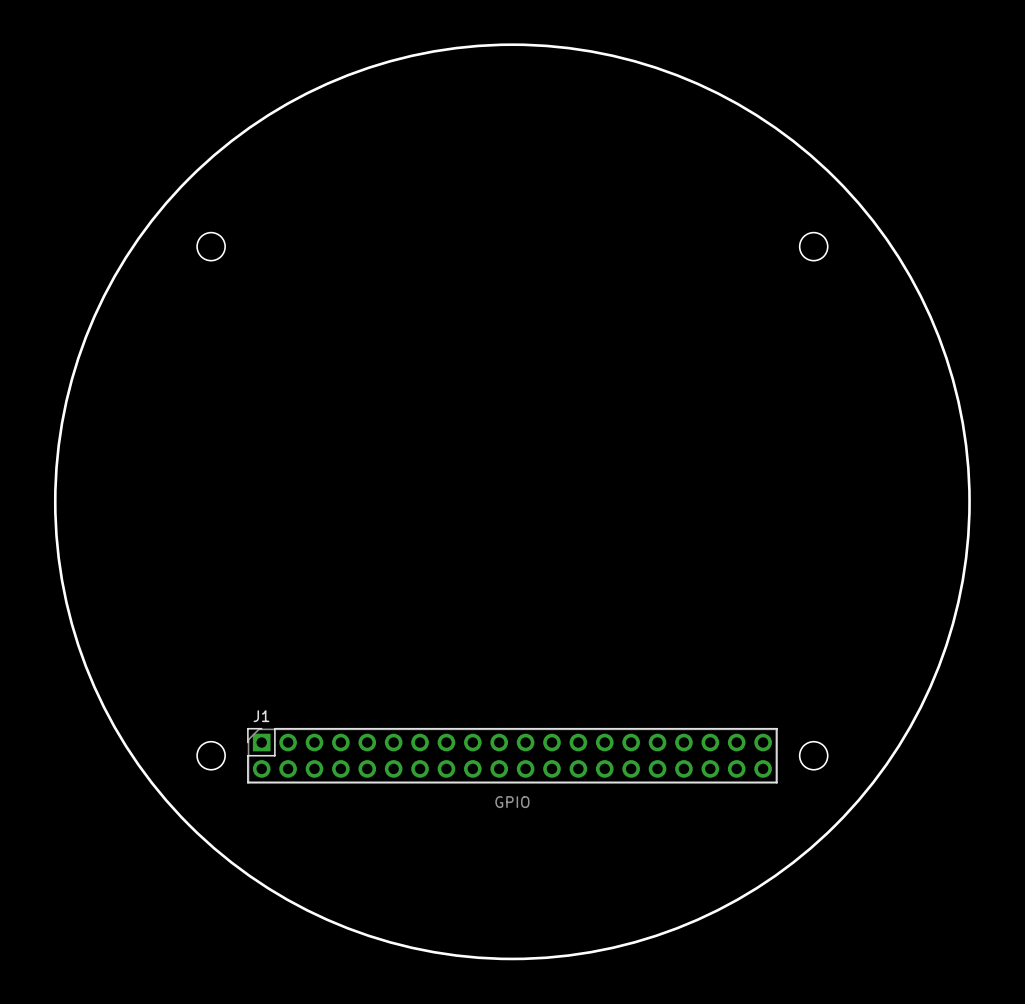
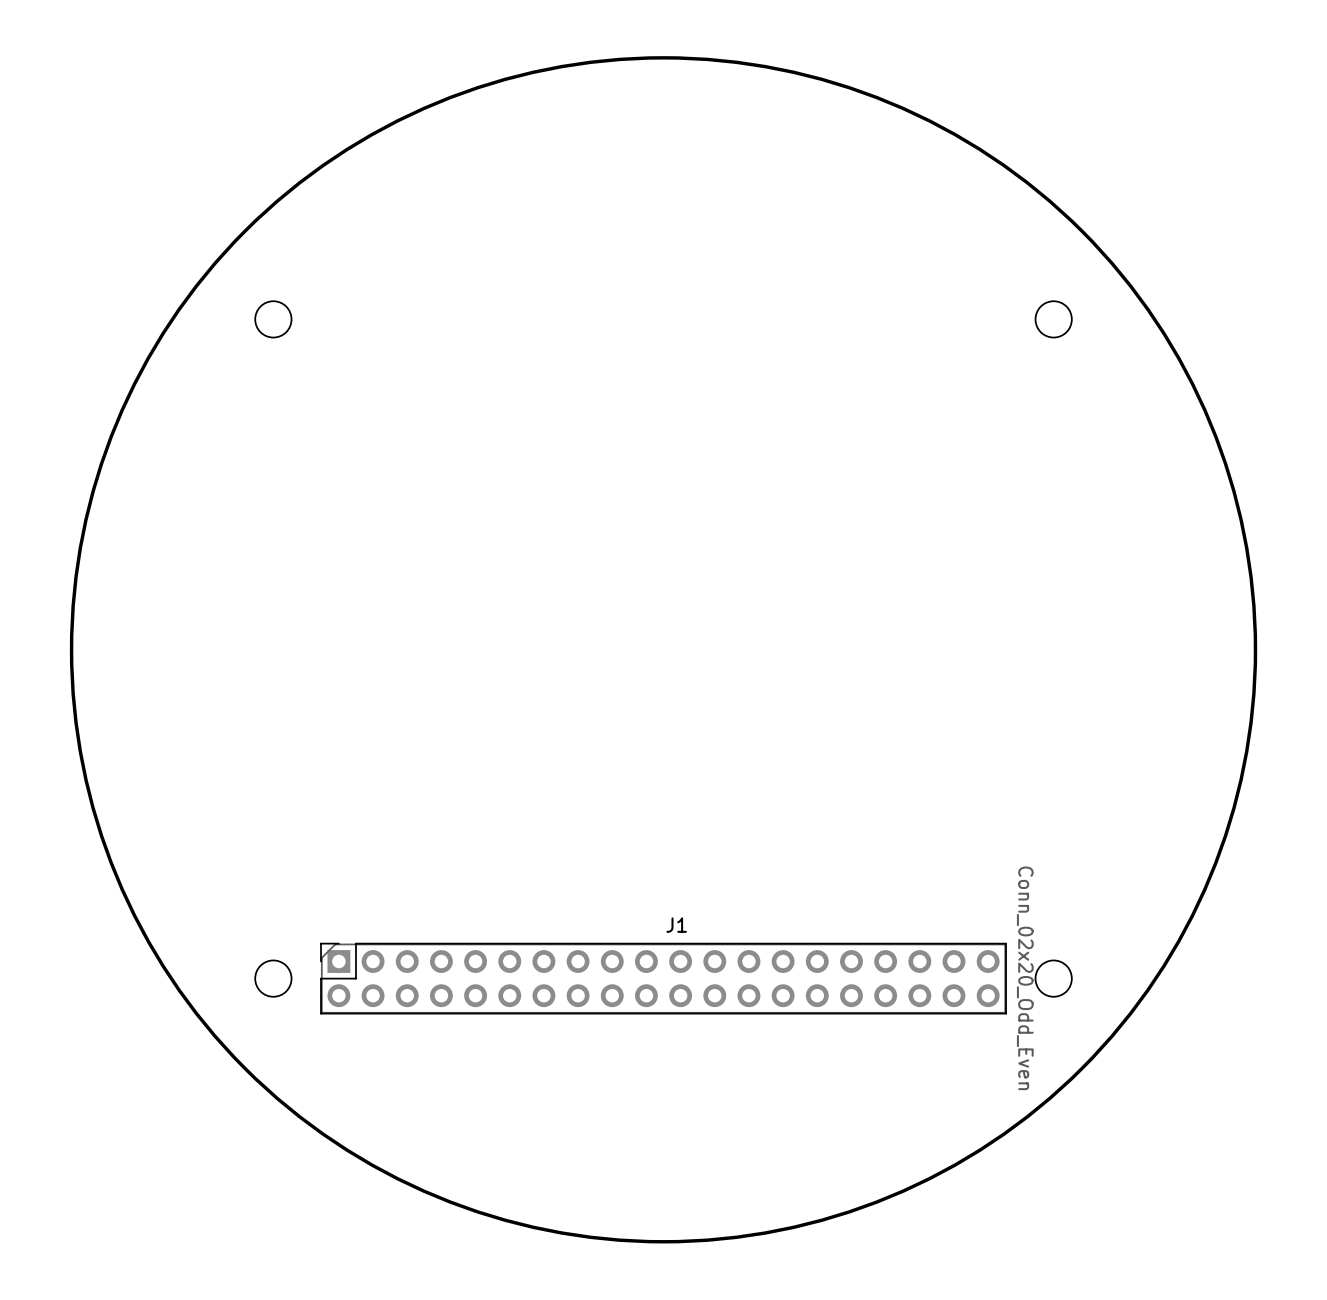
J1 name position: J1 (261, 716) -> J1 (676, 925)
J1 value: GPIO (512, 802) -> Conn_02x20_Odd_Even (1025, 978)

